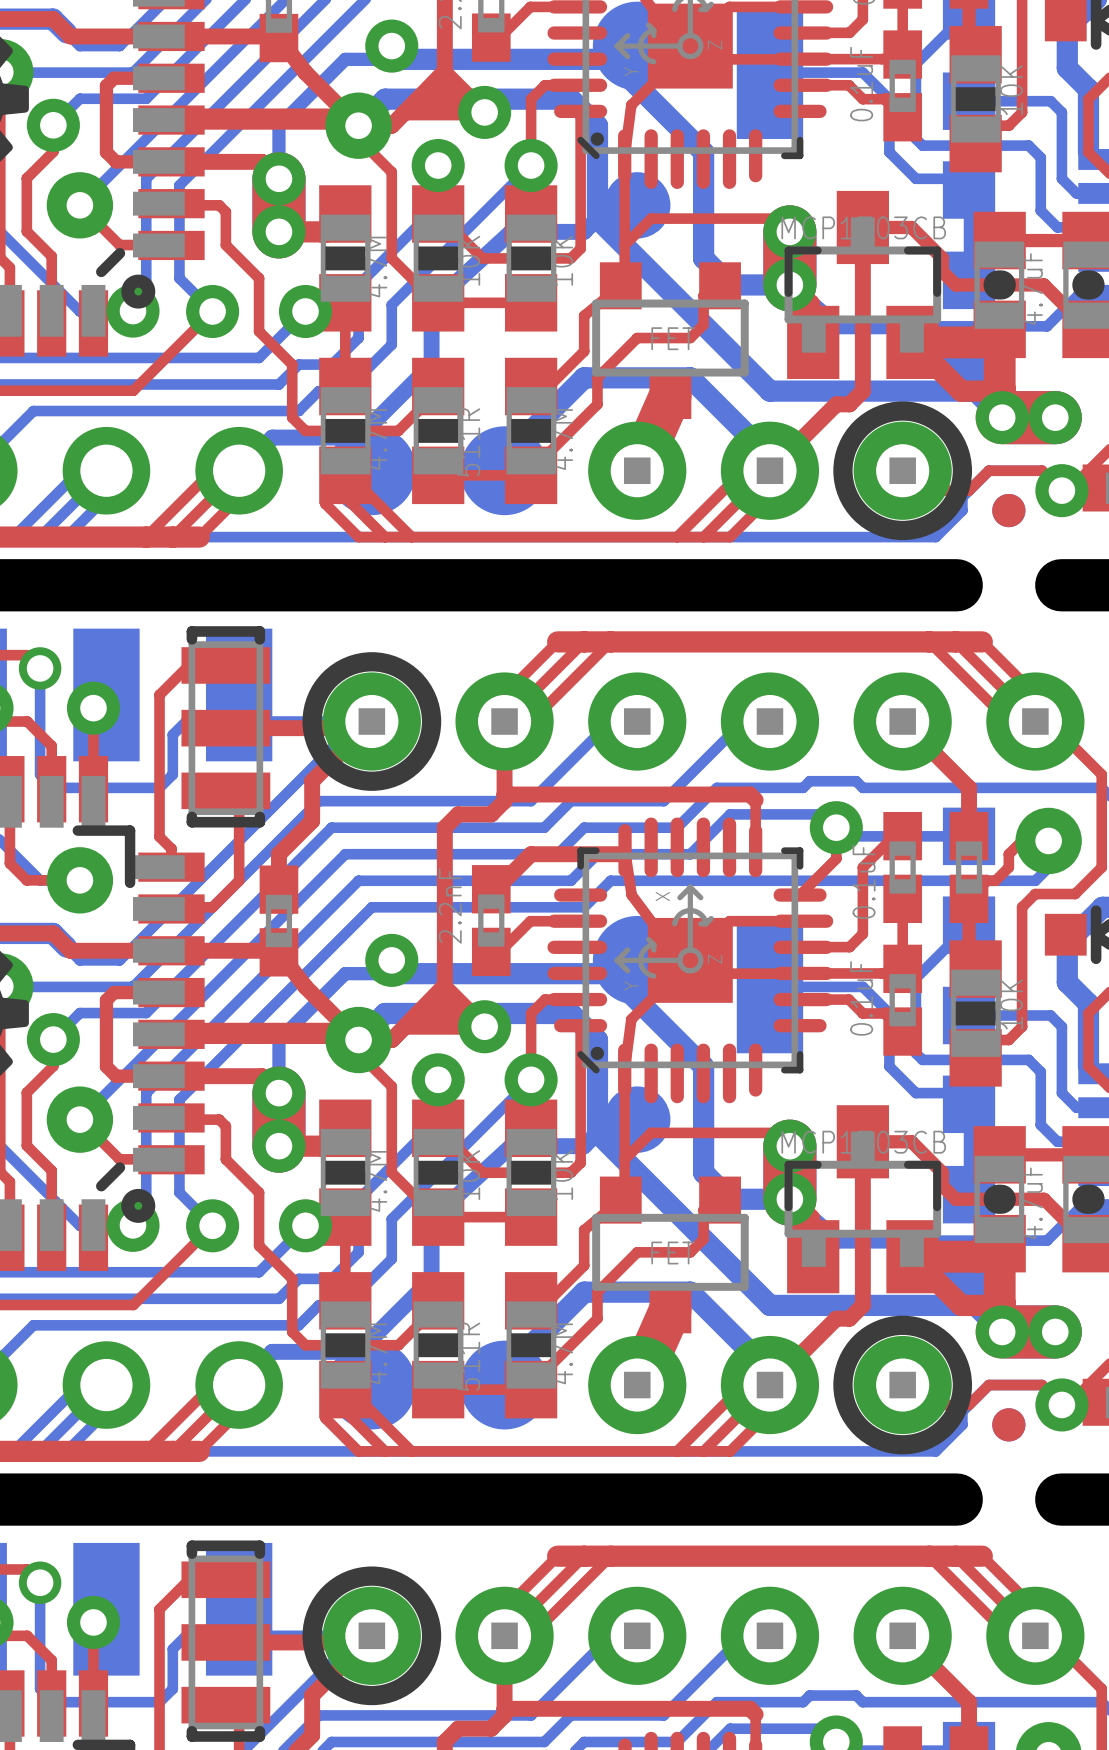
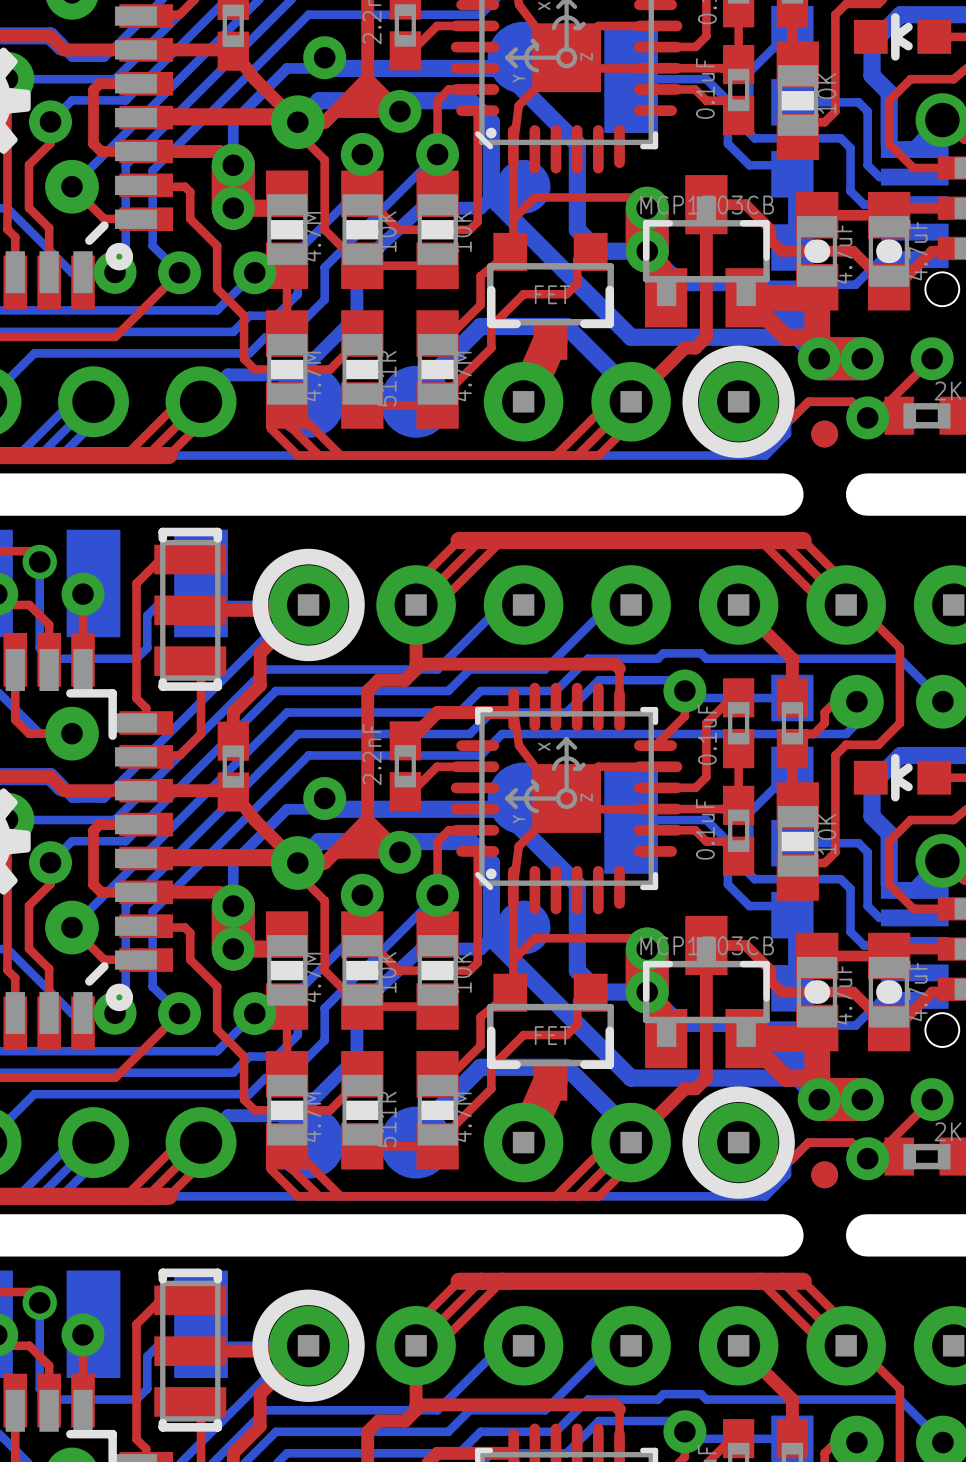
part footprint: [592, 262, 749, 420] -> [486, 232, 615, 360]
part footprint: [592, 1176, 749, 1334] -> [486, 973, 615, 1101]

